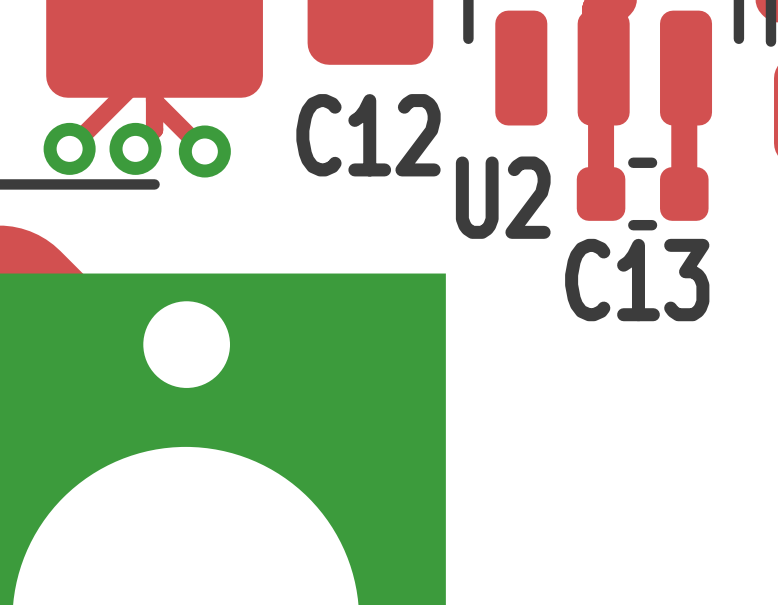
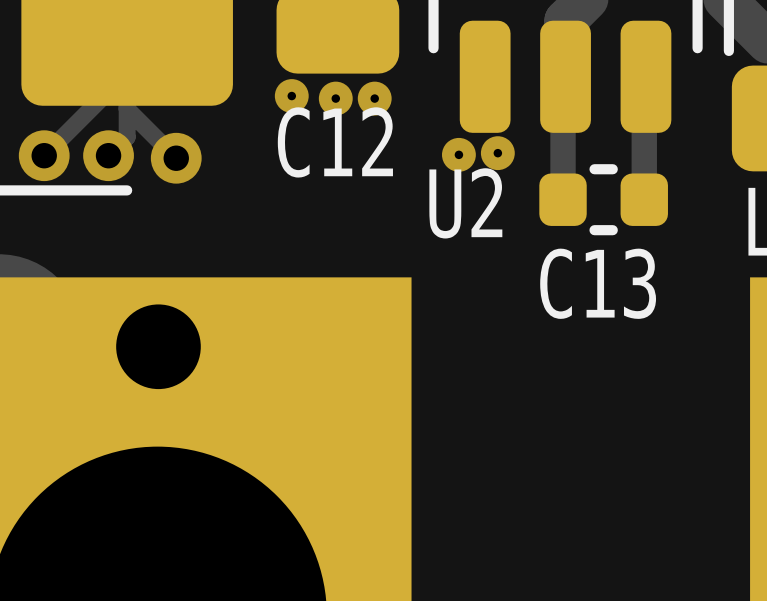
via: none -> (291, 96)
via: none -> (335, 98)
via: none -> (374, 98)
via: none -> (497, 153)
via: none -> (458, 154)

